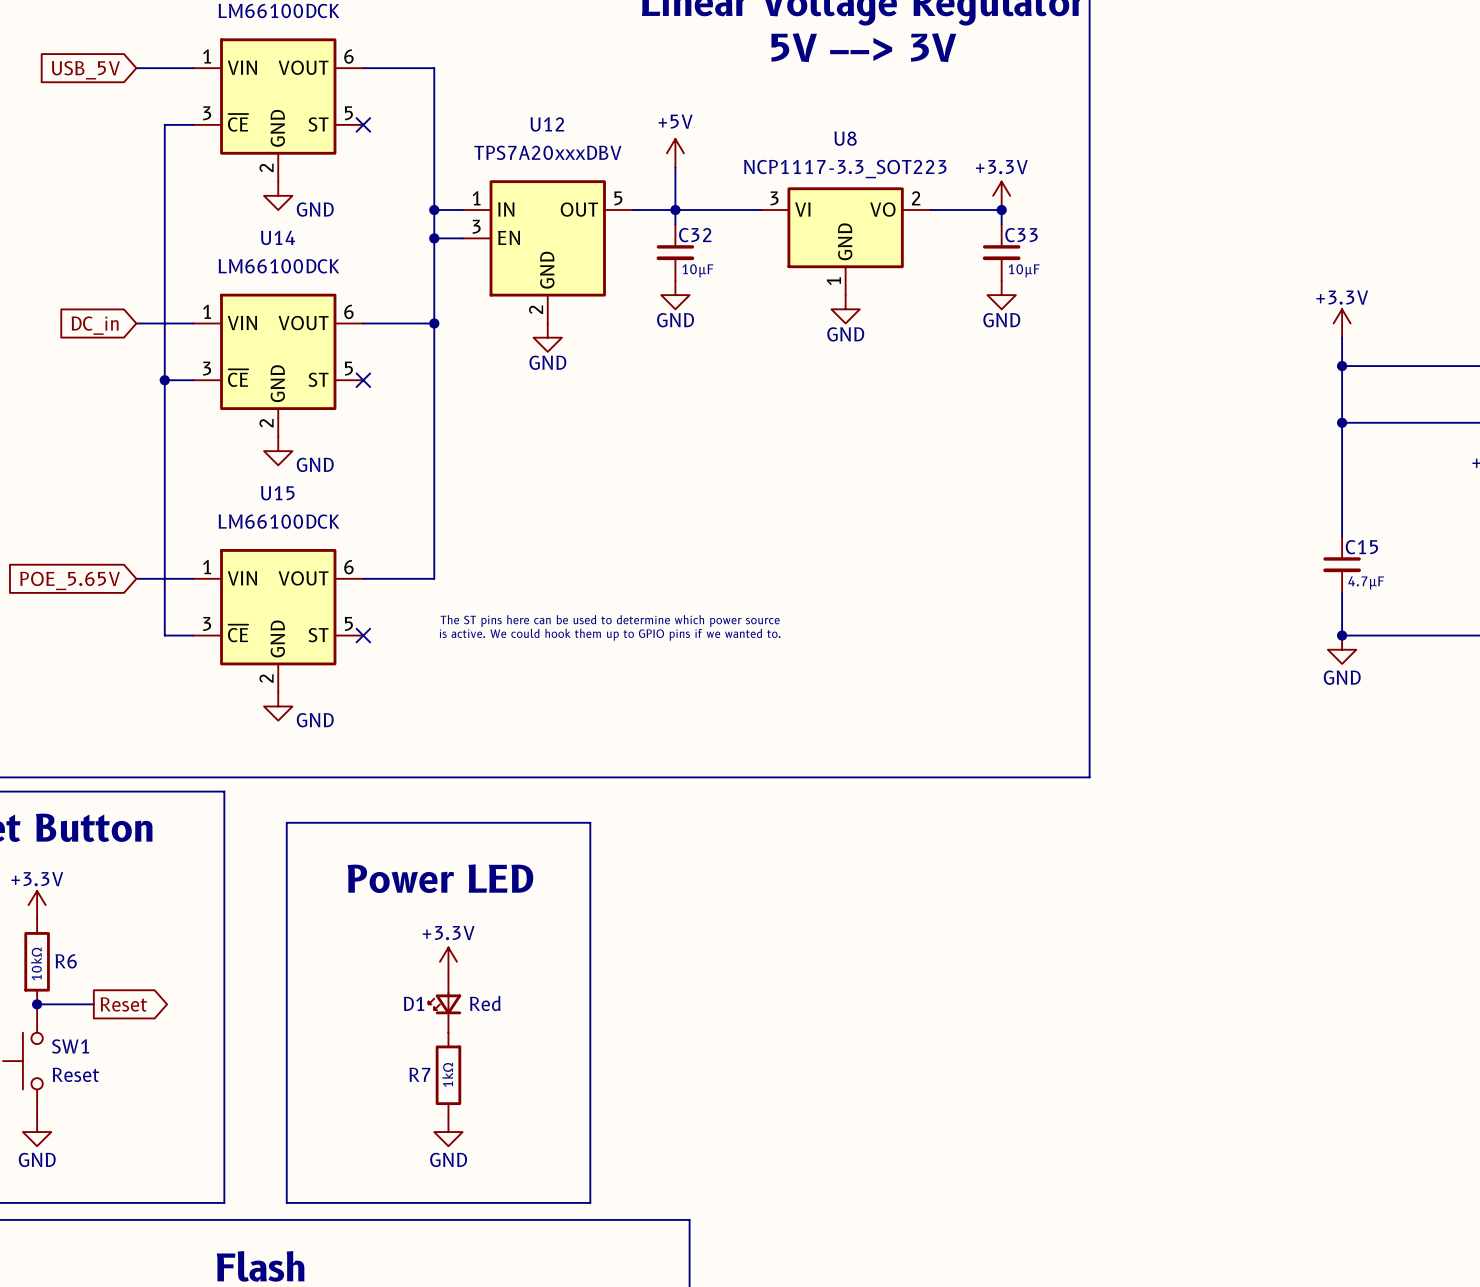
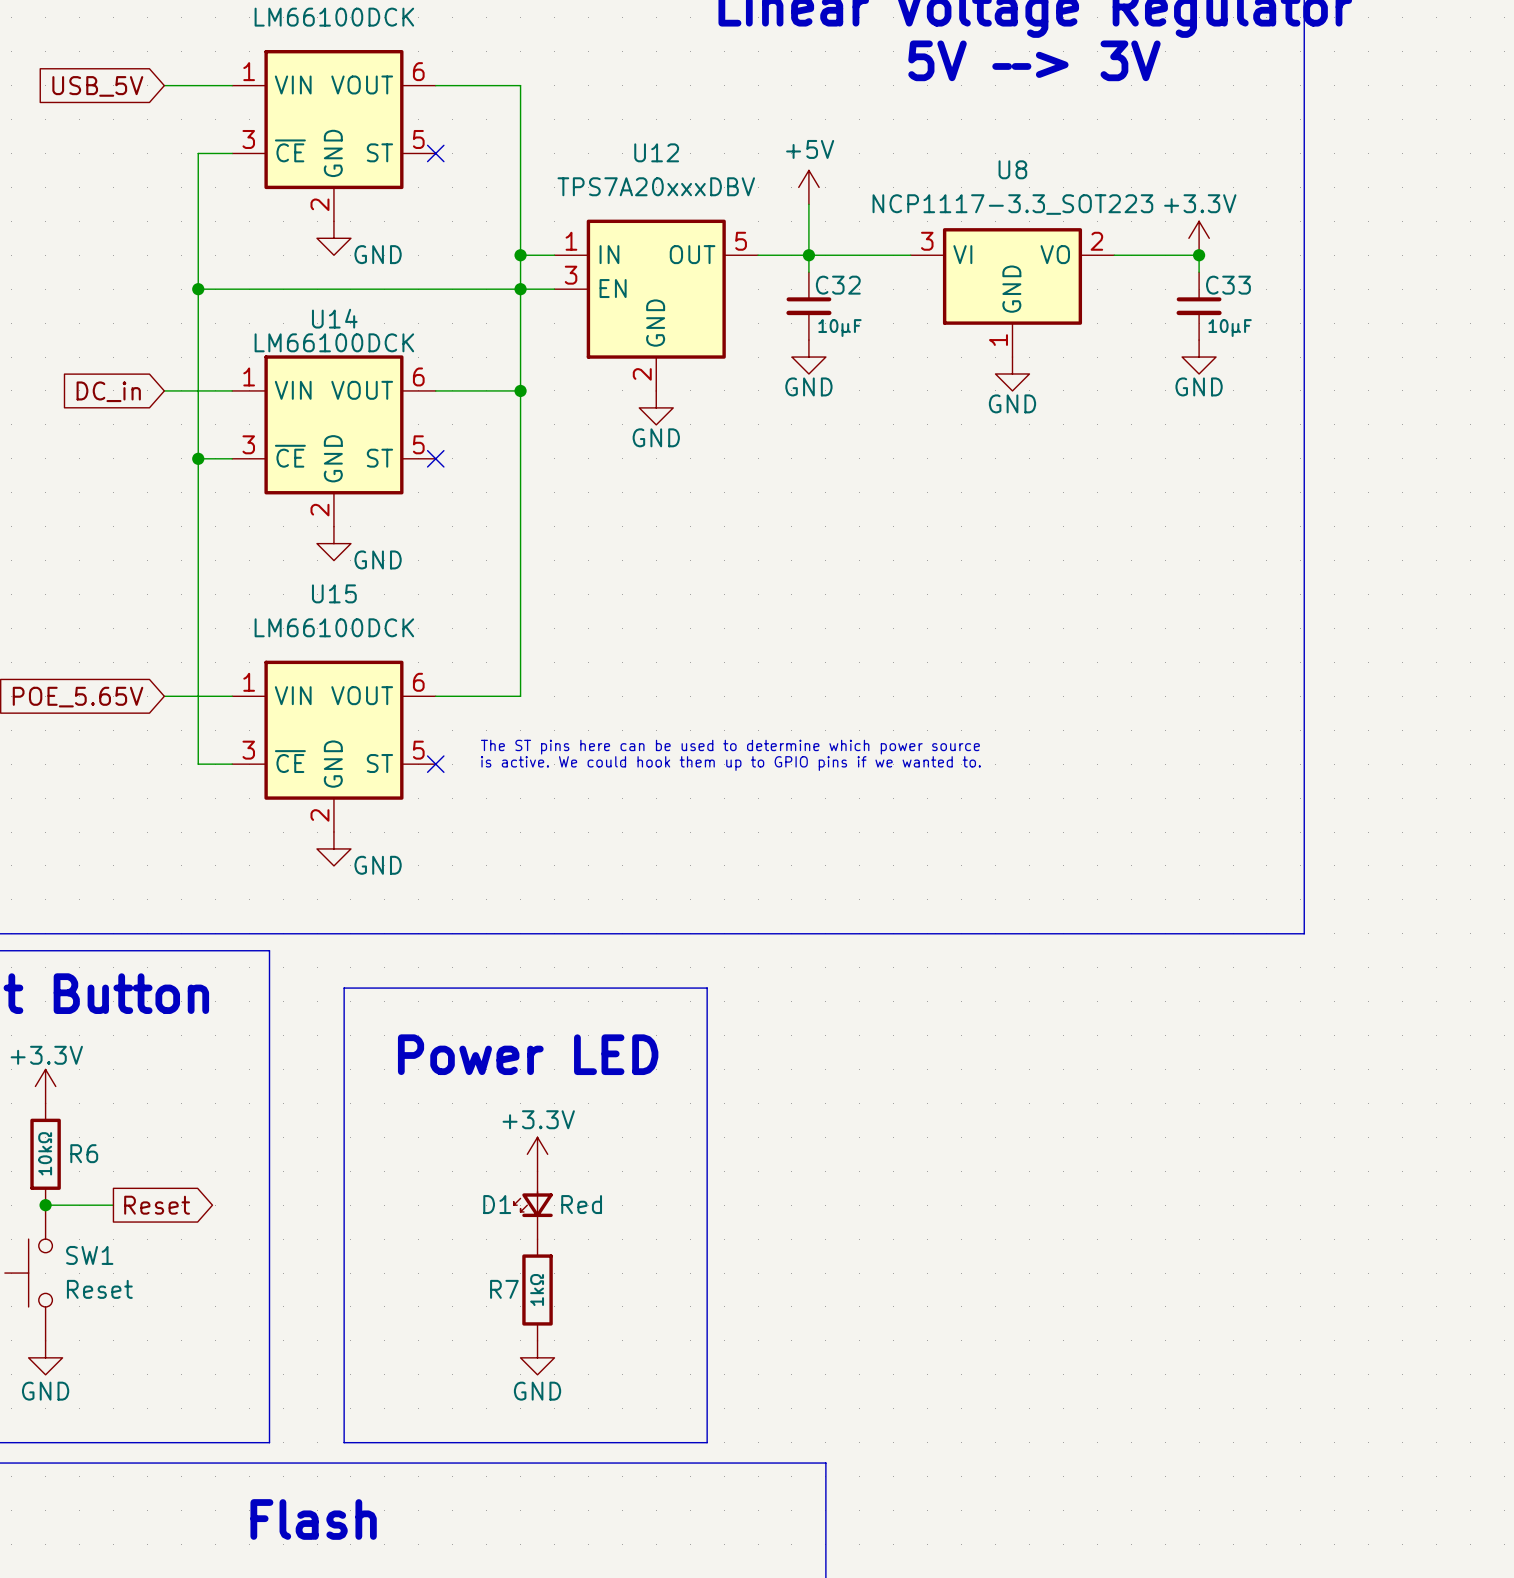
U14 name position: U14 (278, 237) -> U14 (334, 318)
wire: none -> (198, 289) (520, 289)
junction: none -> (198, 289)
U14 value position: LM66100DCK (278, 266) -> LM66100DCK (334, 342)

